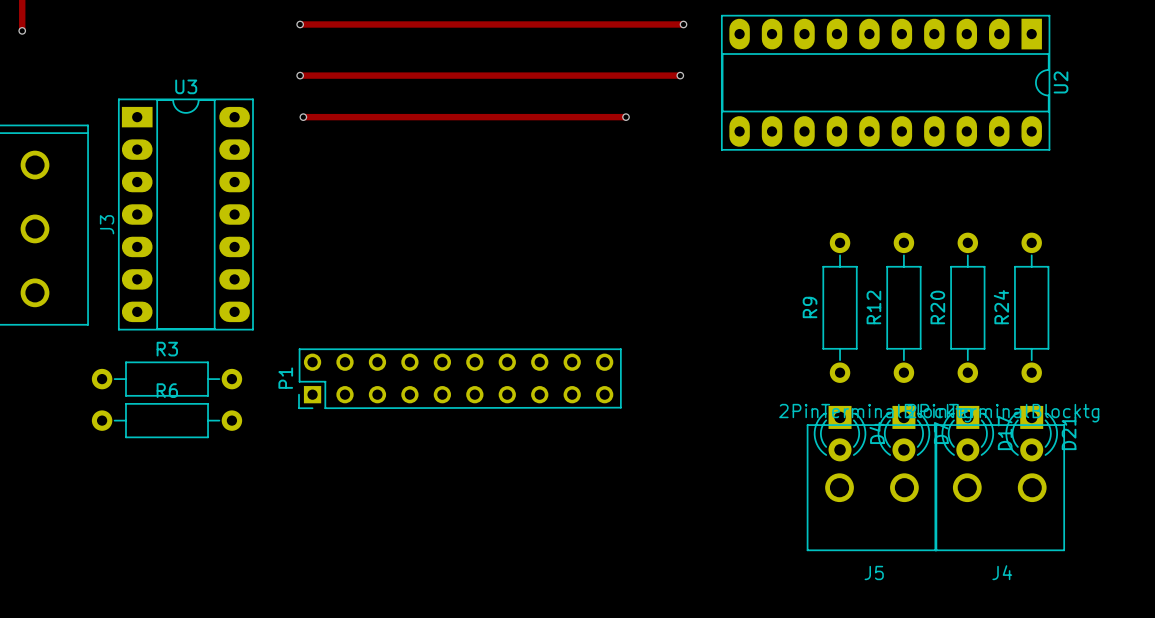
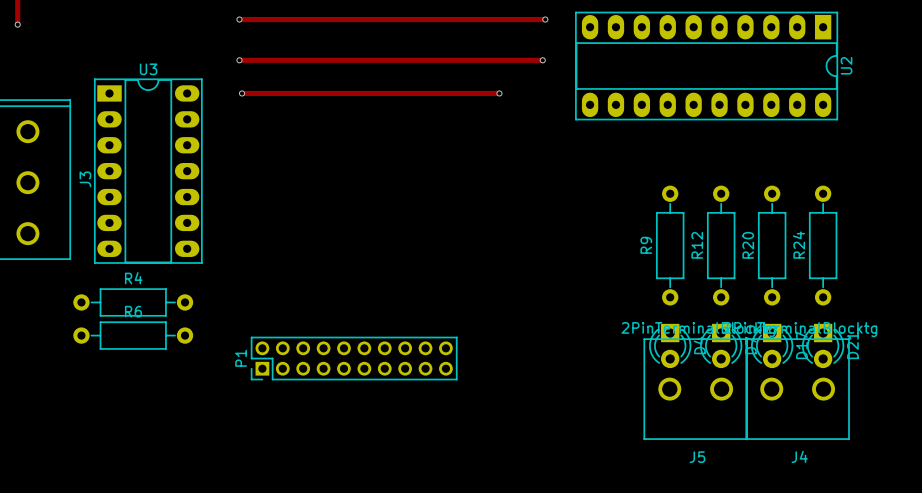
P1 footprint: [298, 348, 622, 409] -> [250, 336, 458, 381]
R3 name: R3 (167, 349) -> R4 (133, 278)
P1 name position: P1 (285, 378) -> P1 (241, 358)

